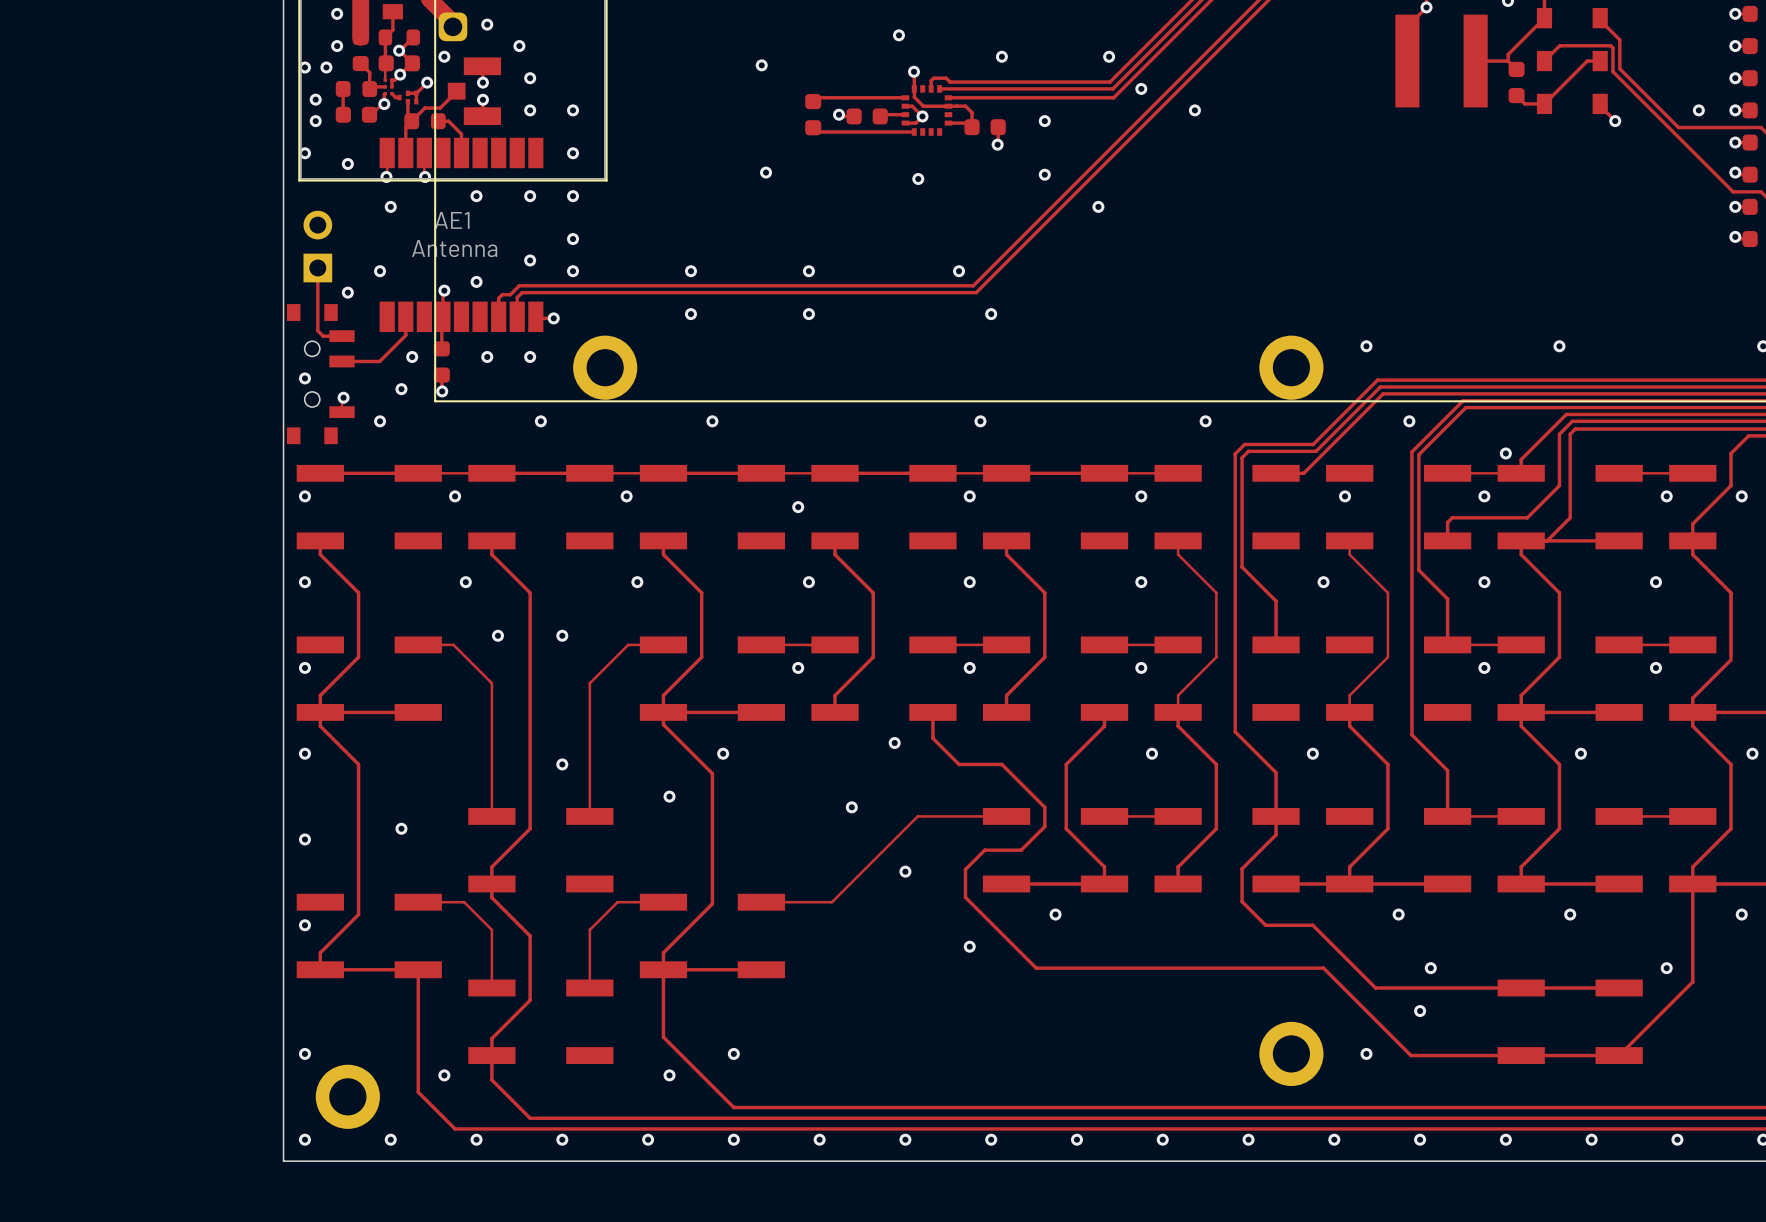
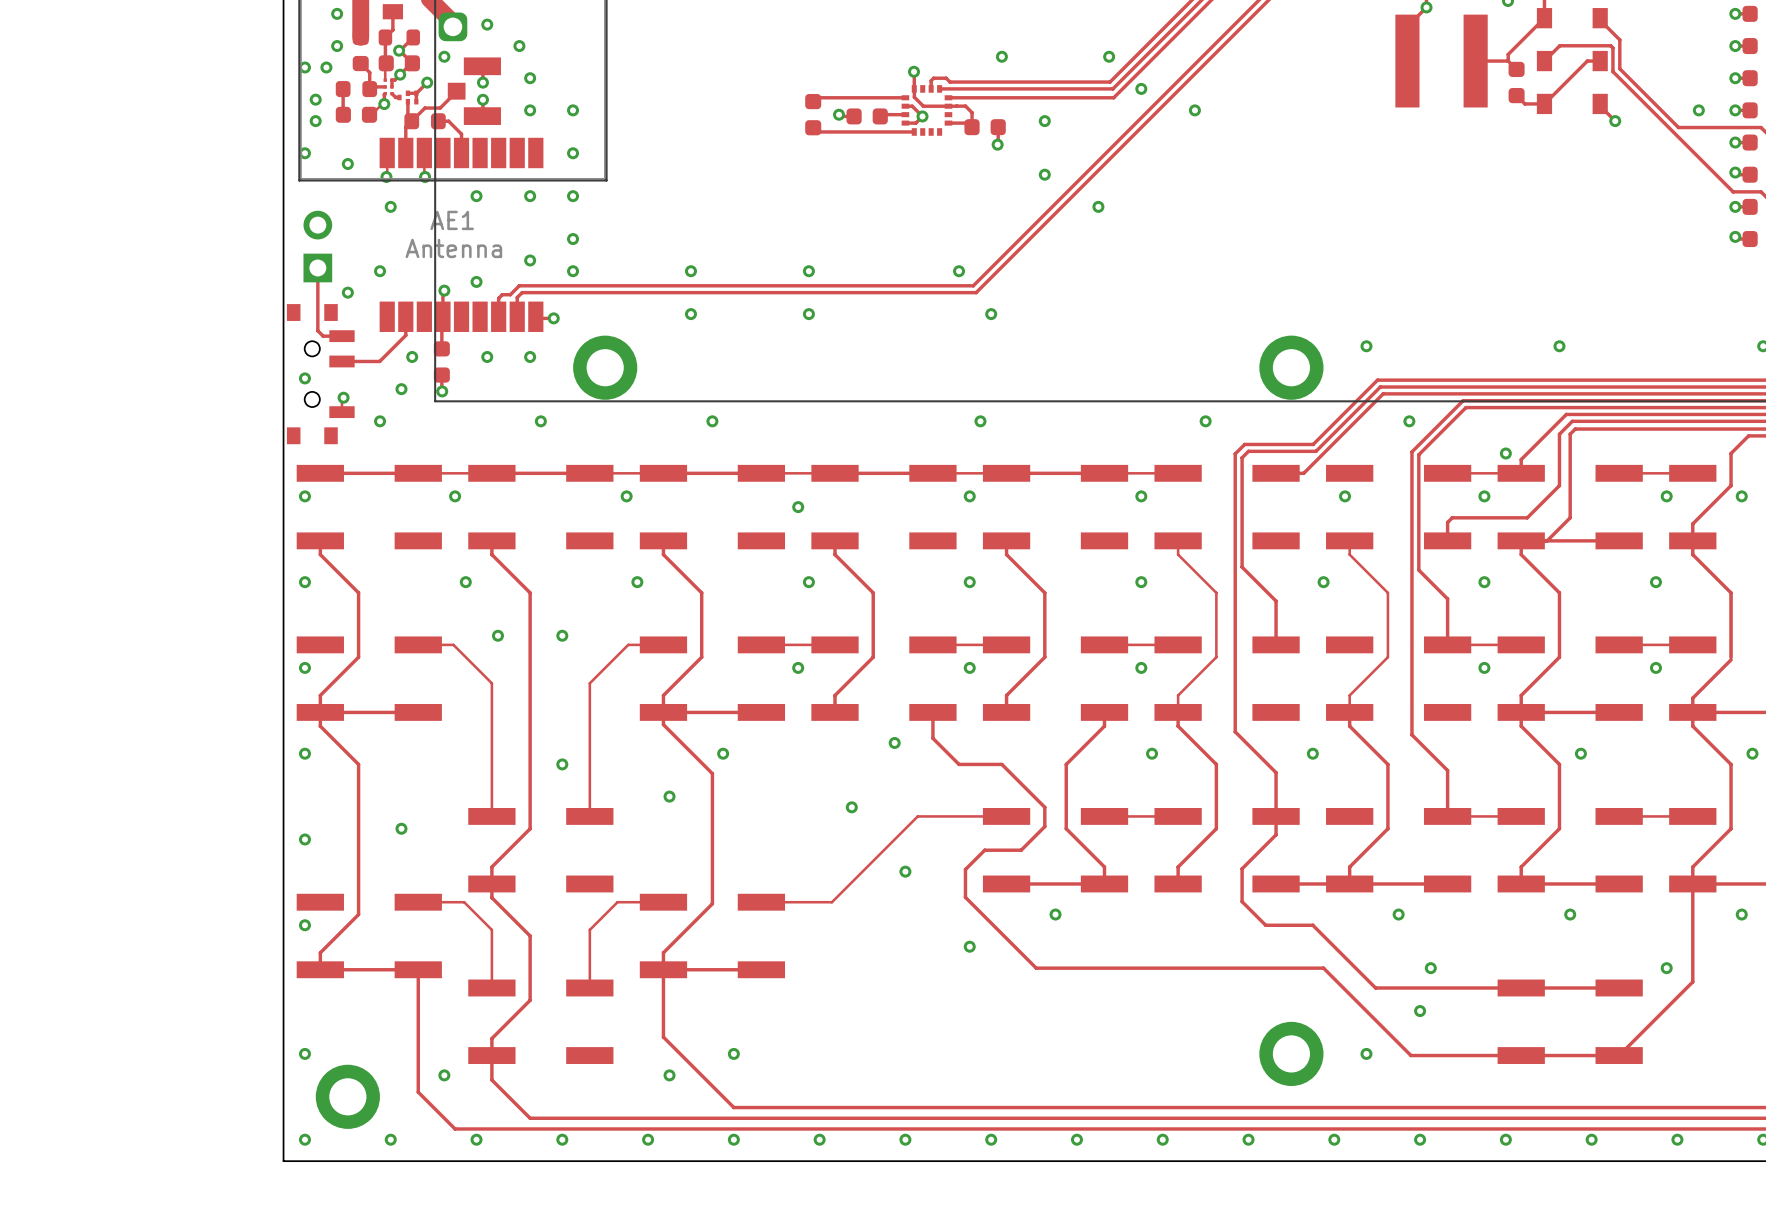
via: (898, 35) -> none
via: (761, 65) -> none
via: (766, 172) -> none
via: (918, 179) -> none

